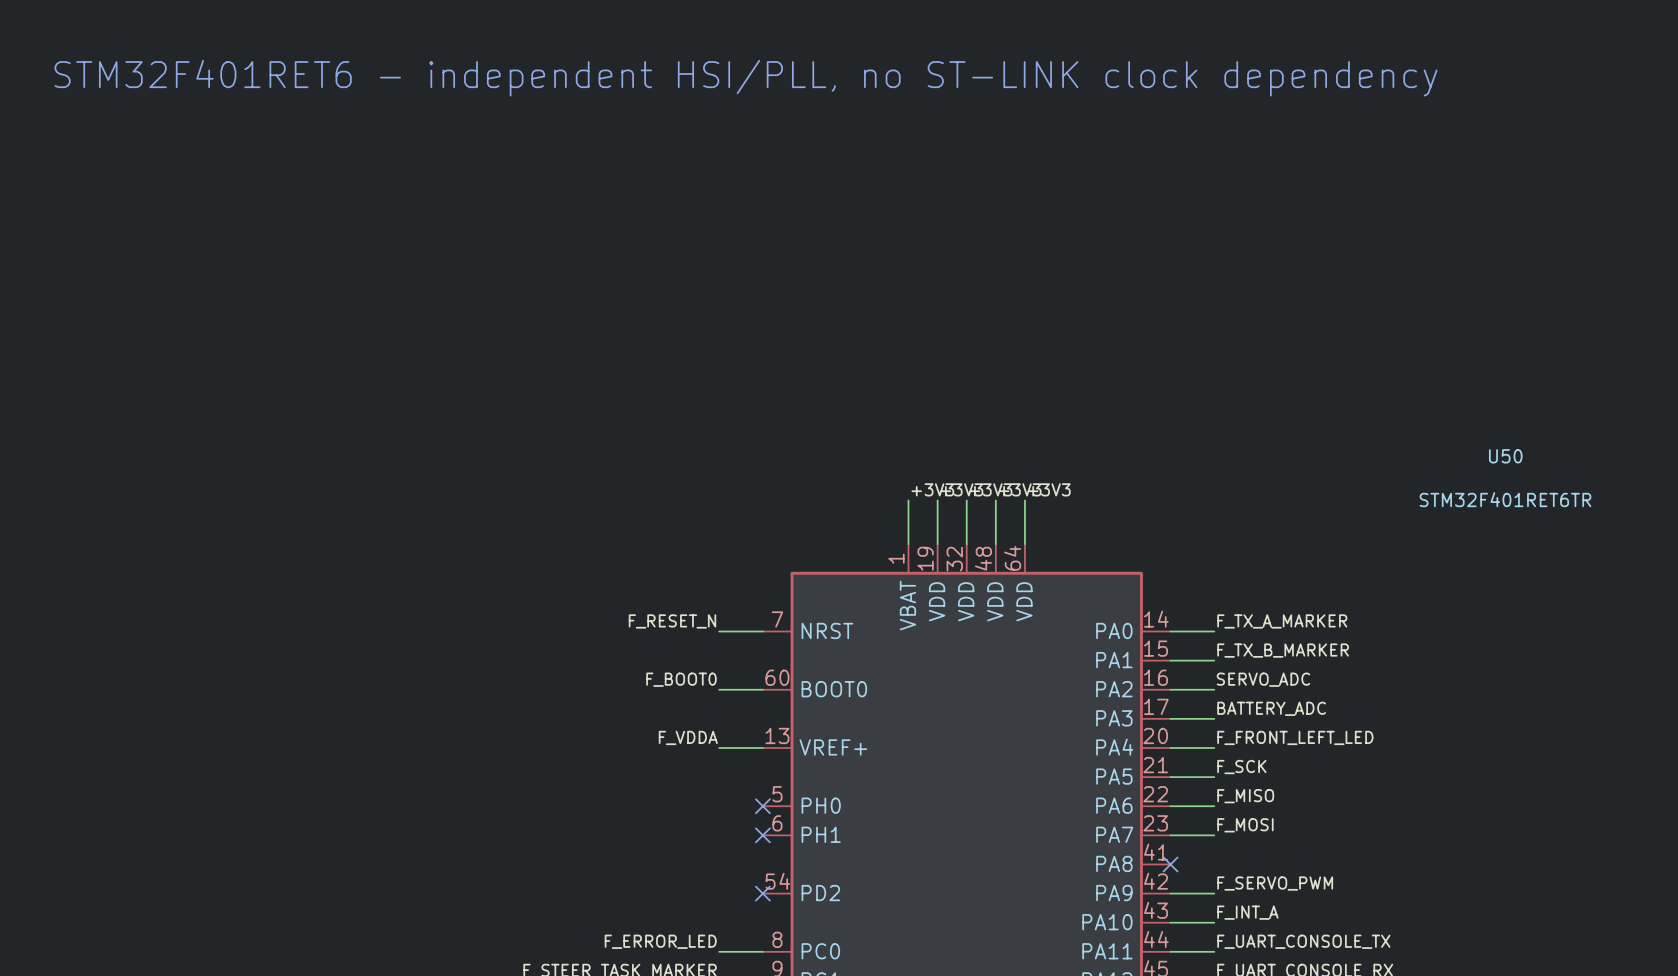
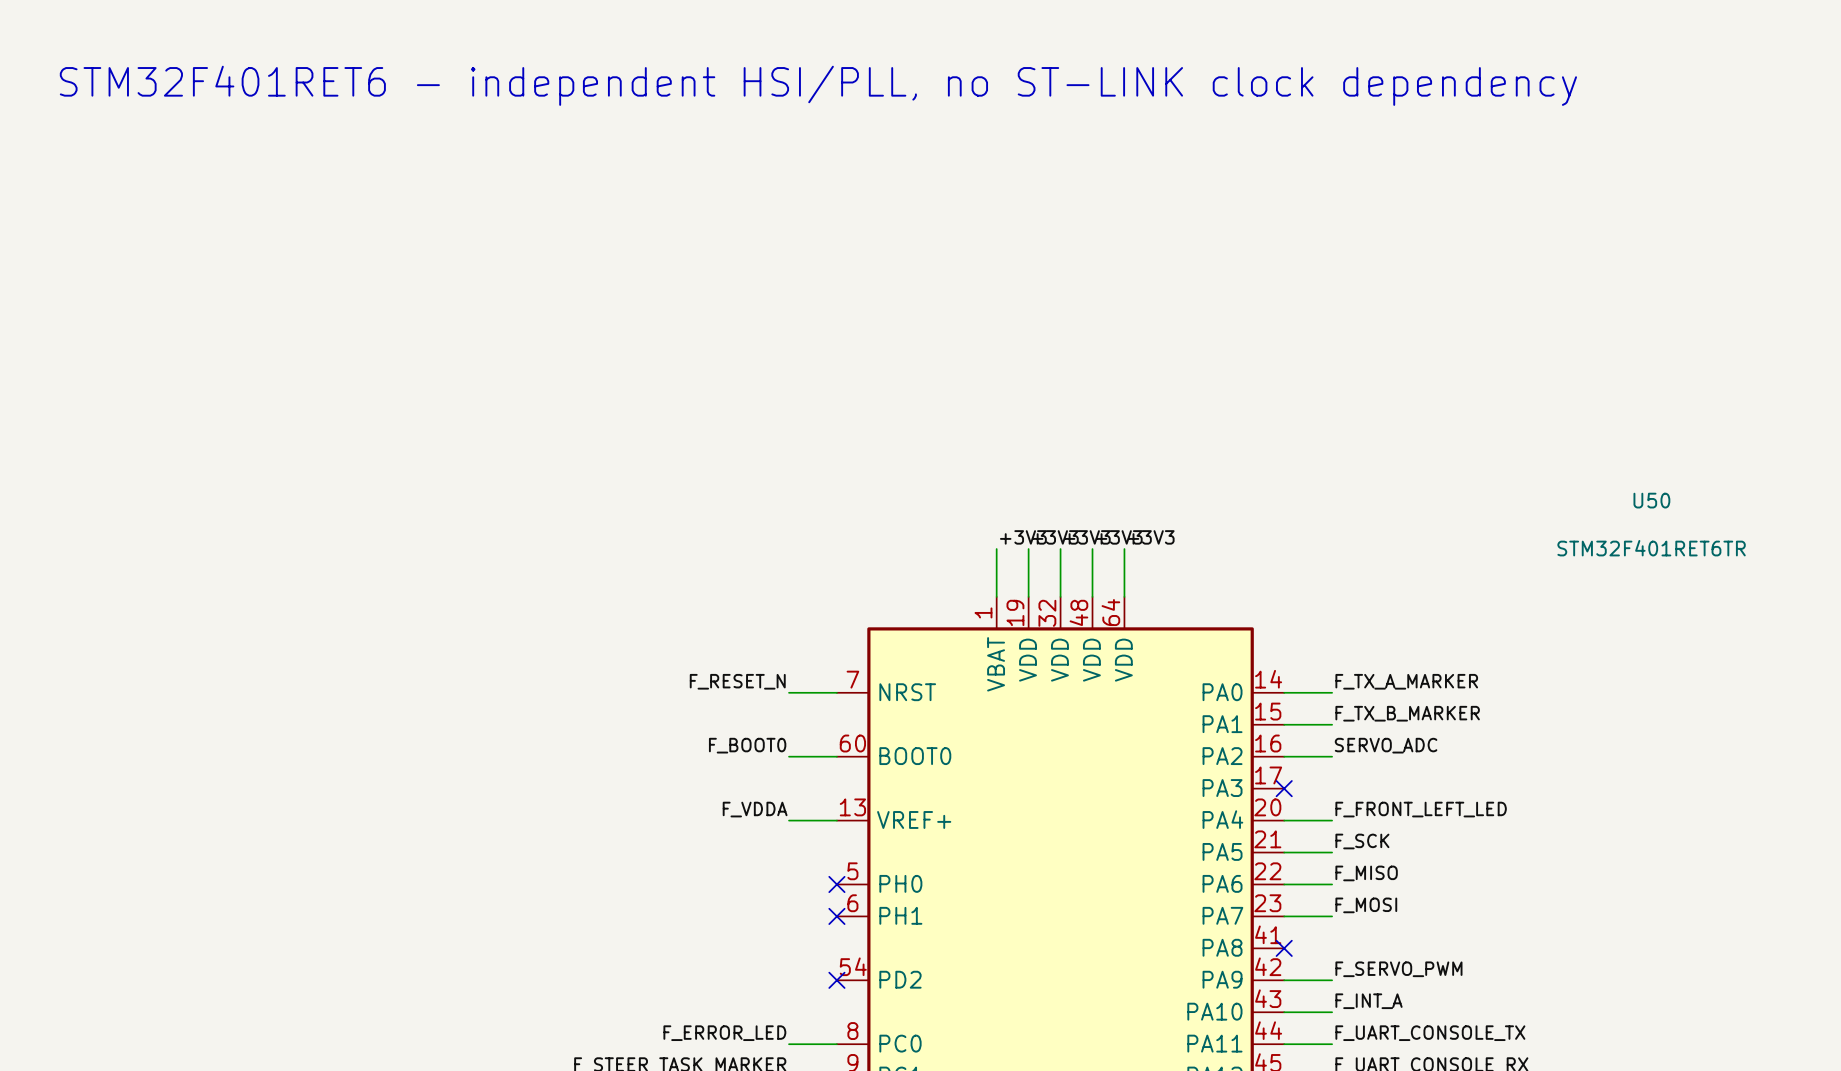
label: BATTERY_ADC (1271, 708) -> none
wire: (1170, 718) (1214, 718) -> none
no-connect mark: none -> (1284, 788)

